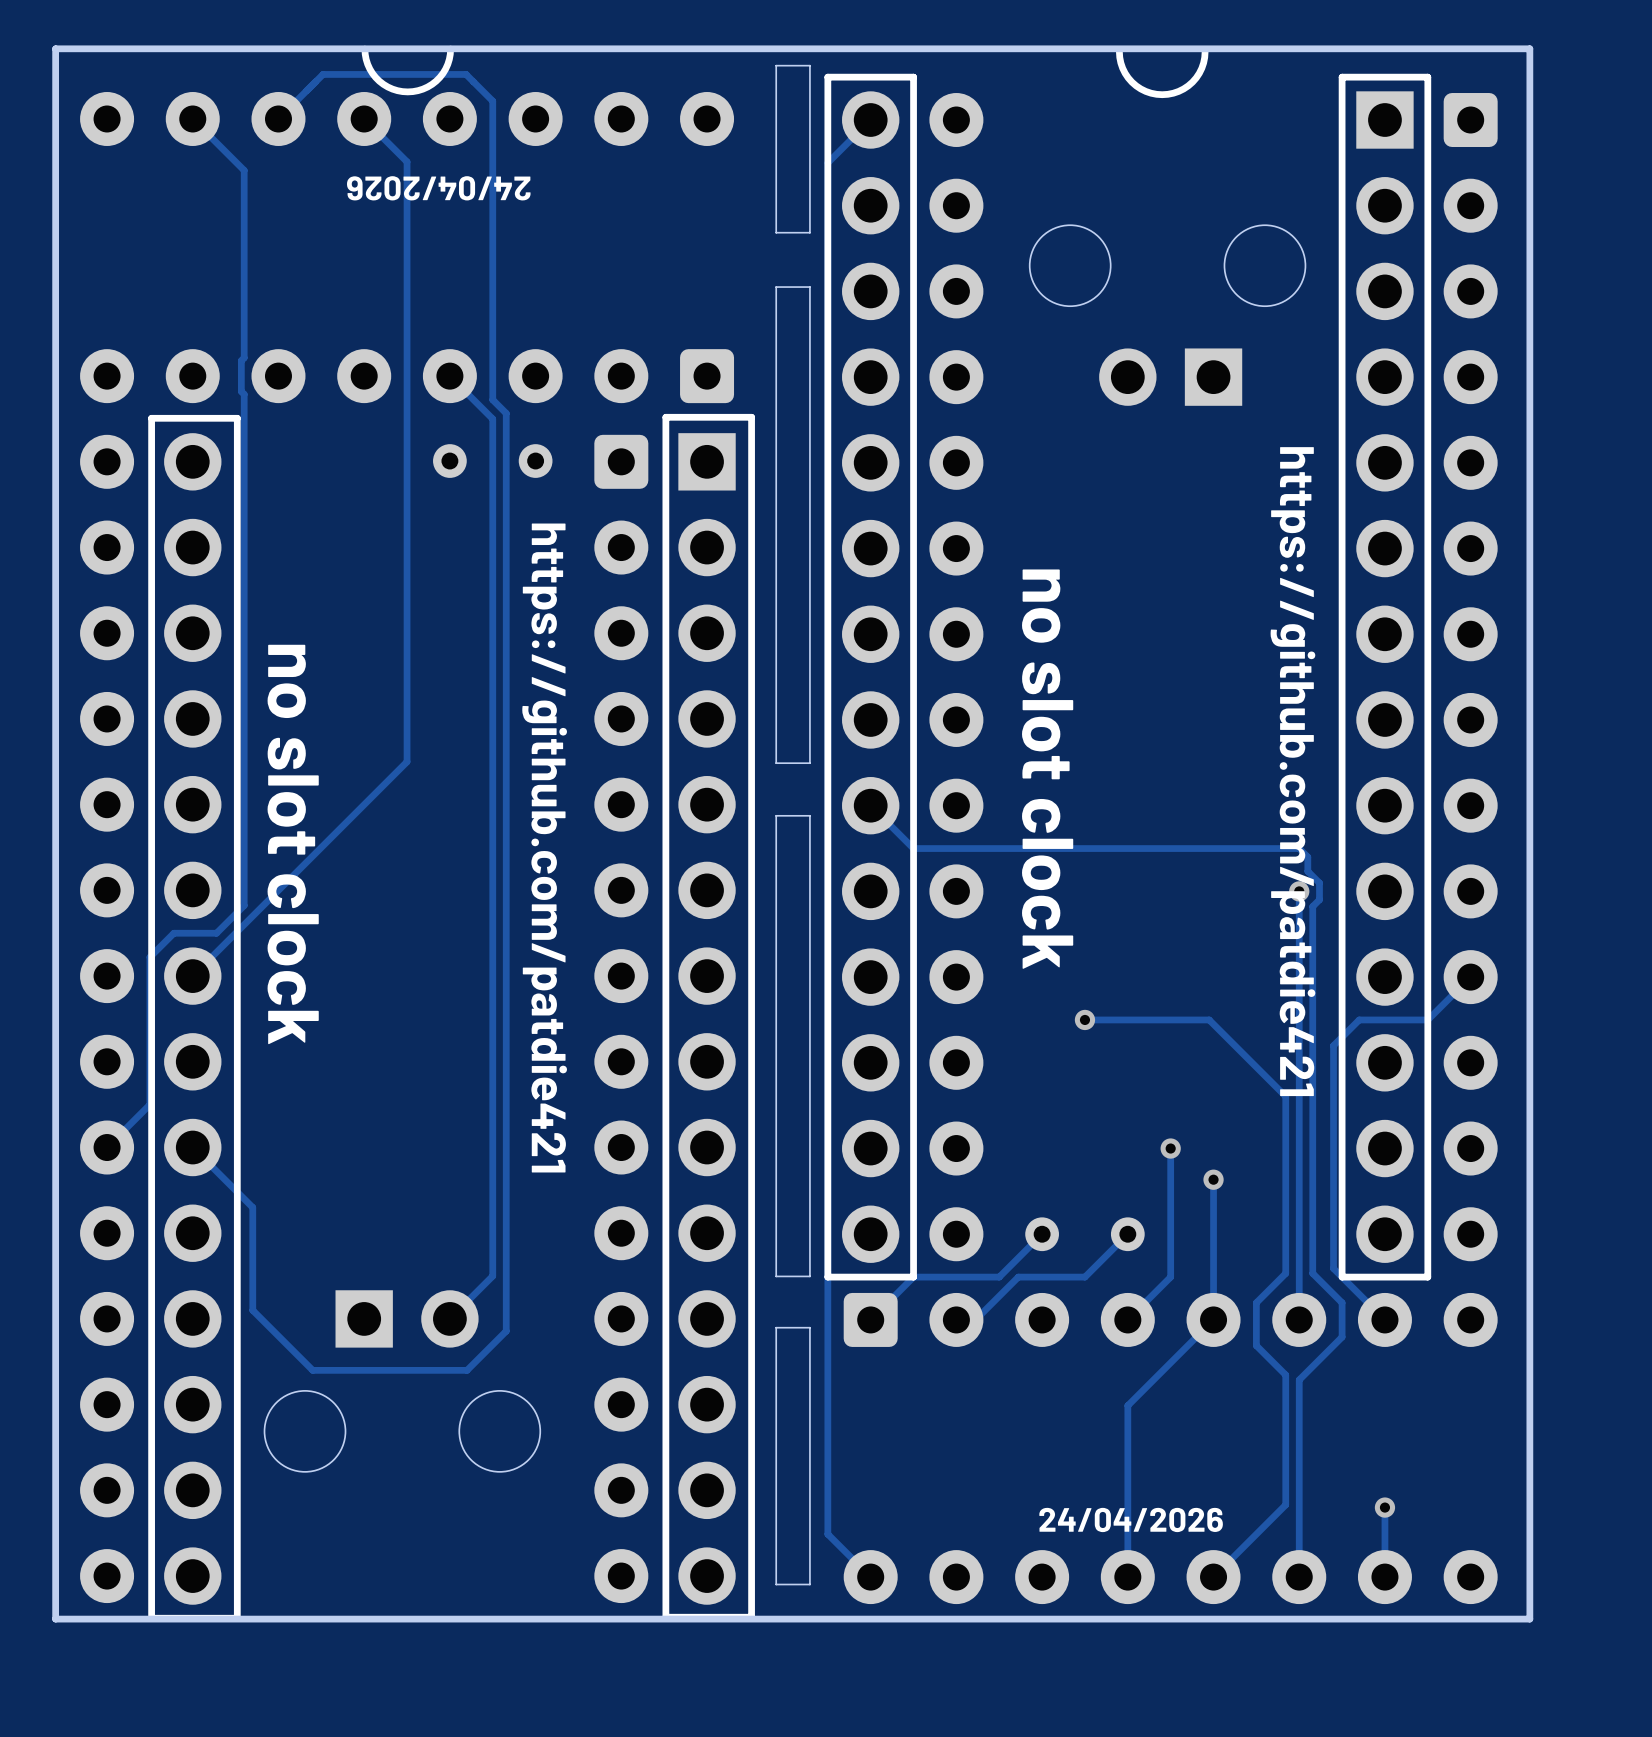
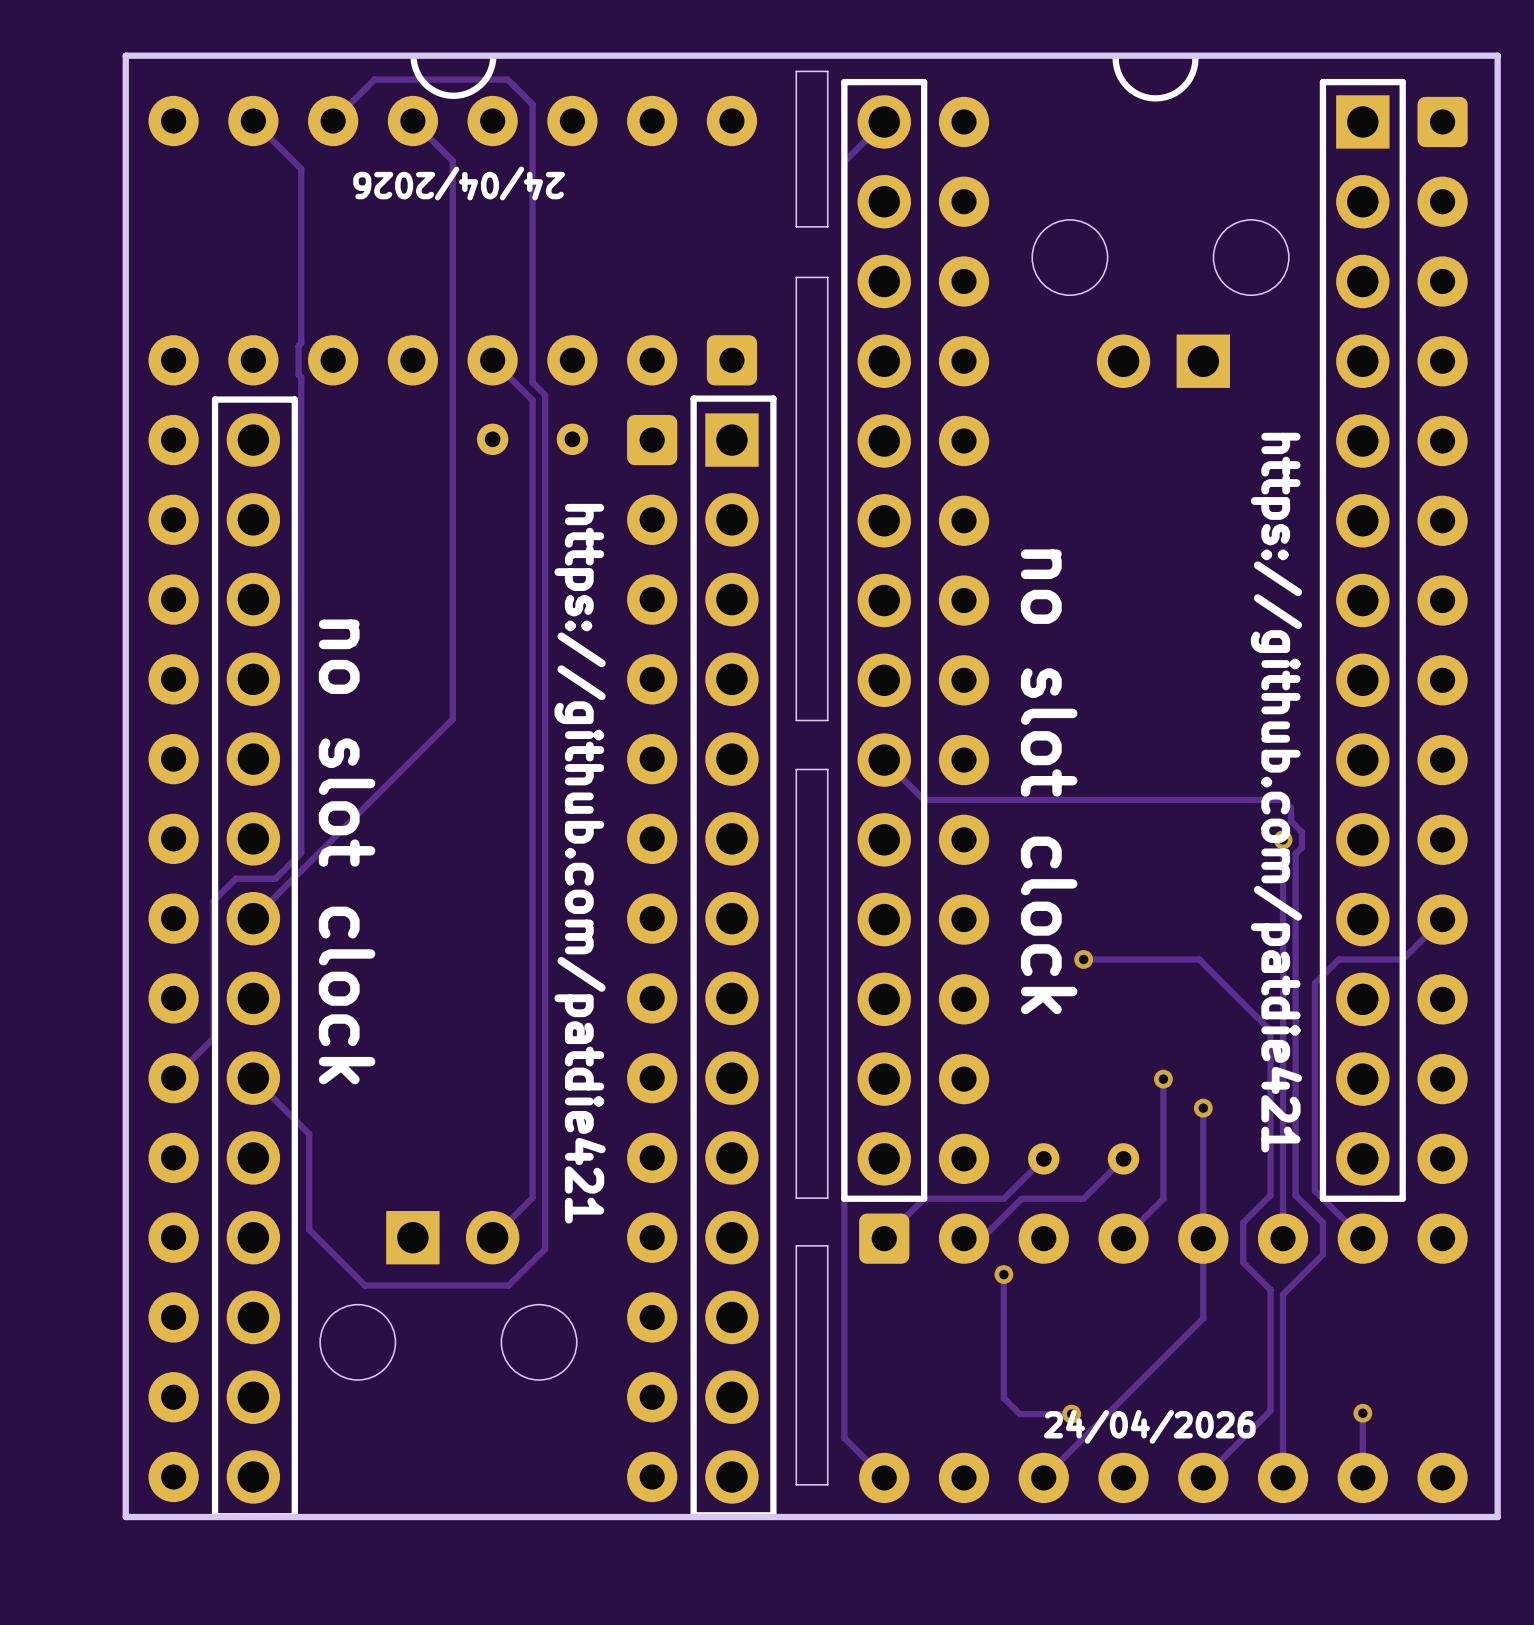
track: (1213, 1319) (1127, 1405) (1127, 1577) -> (1203, 1238) (1203, 1318) (1043, 1477)
track: none -> (1003, 1274) (1003, 1398) (1019, 1414) (1071, 1414)
via: none -> (1003, 1274)
via: none -> (1071, 1414)

